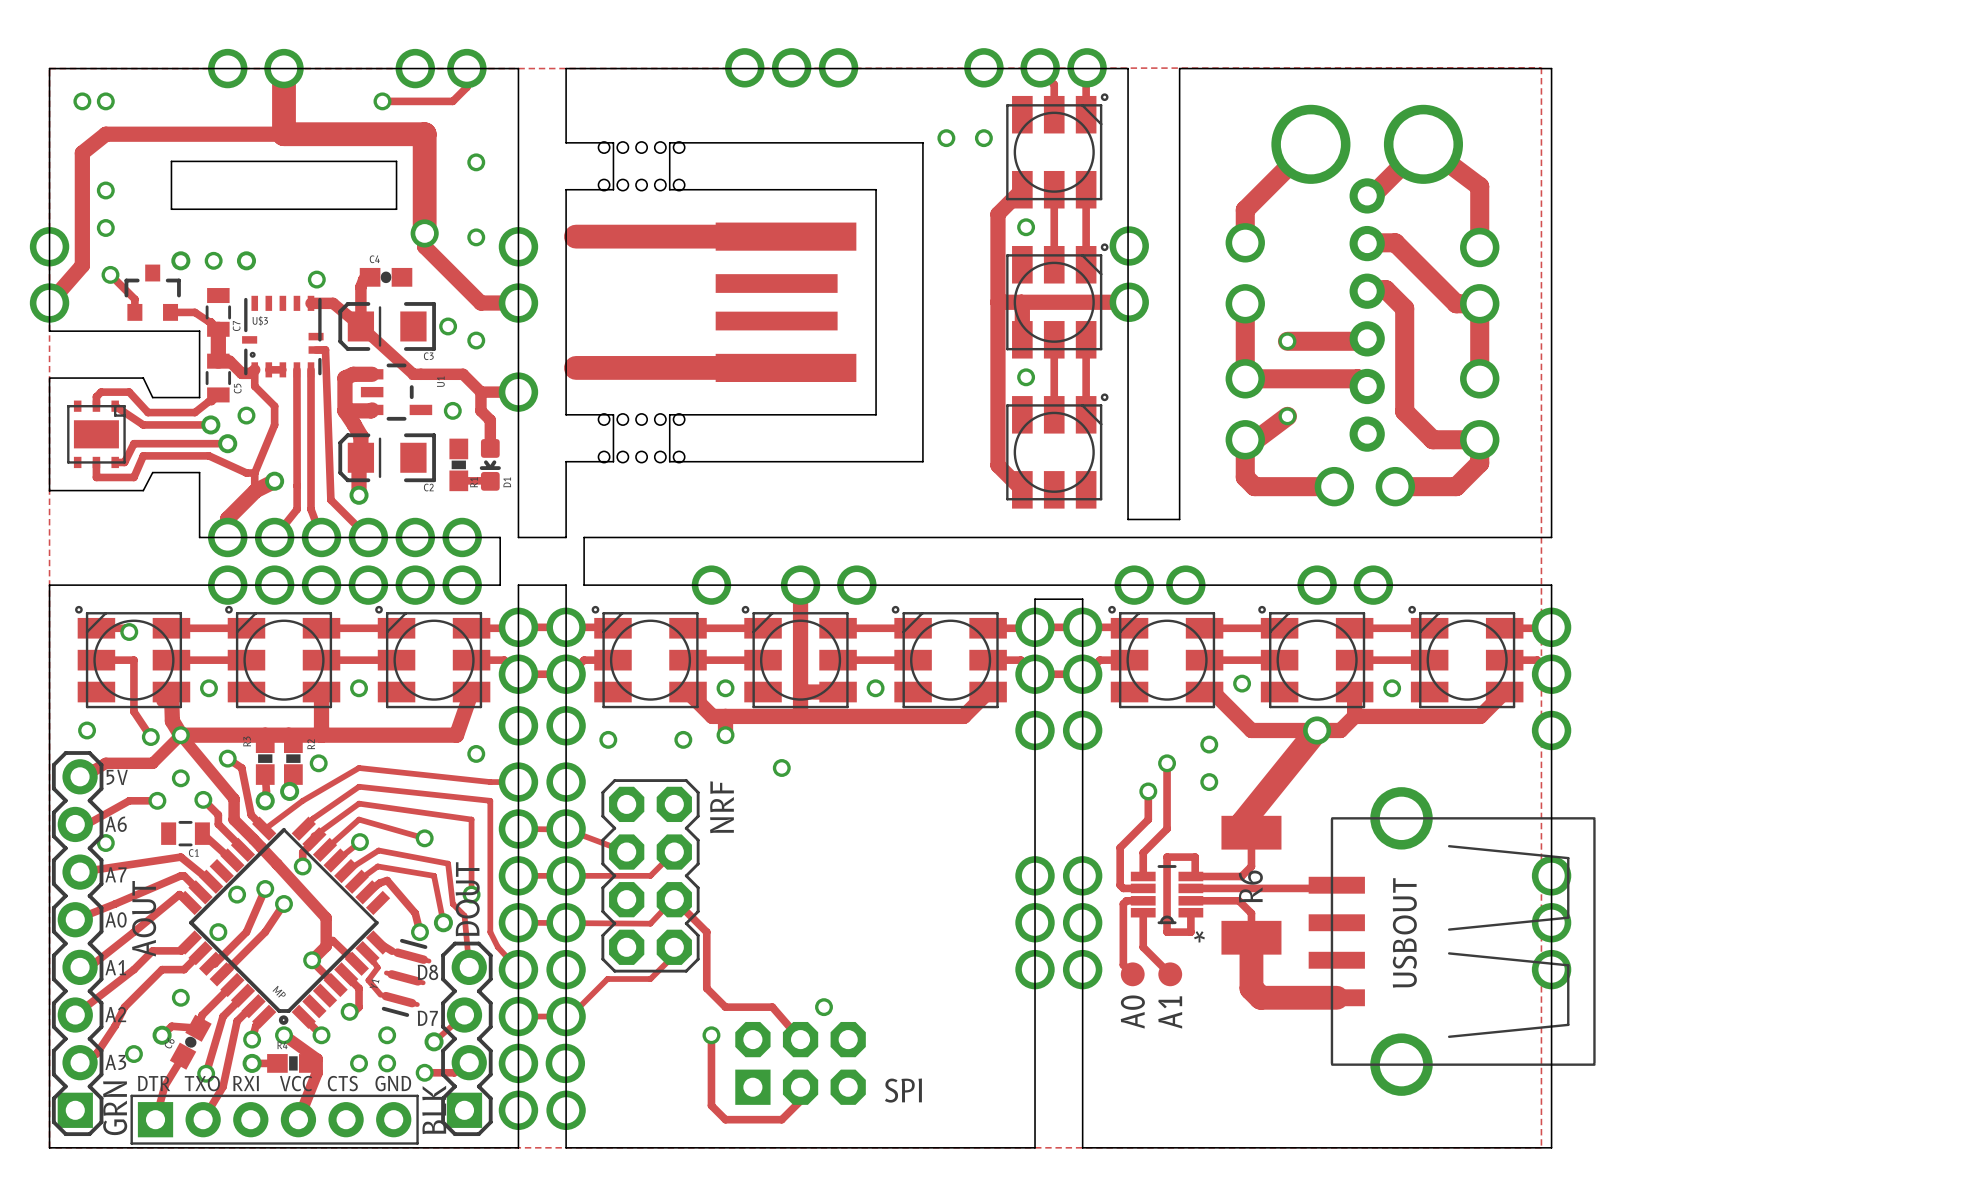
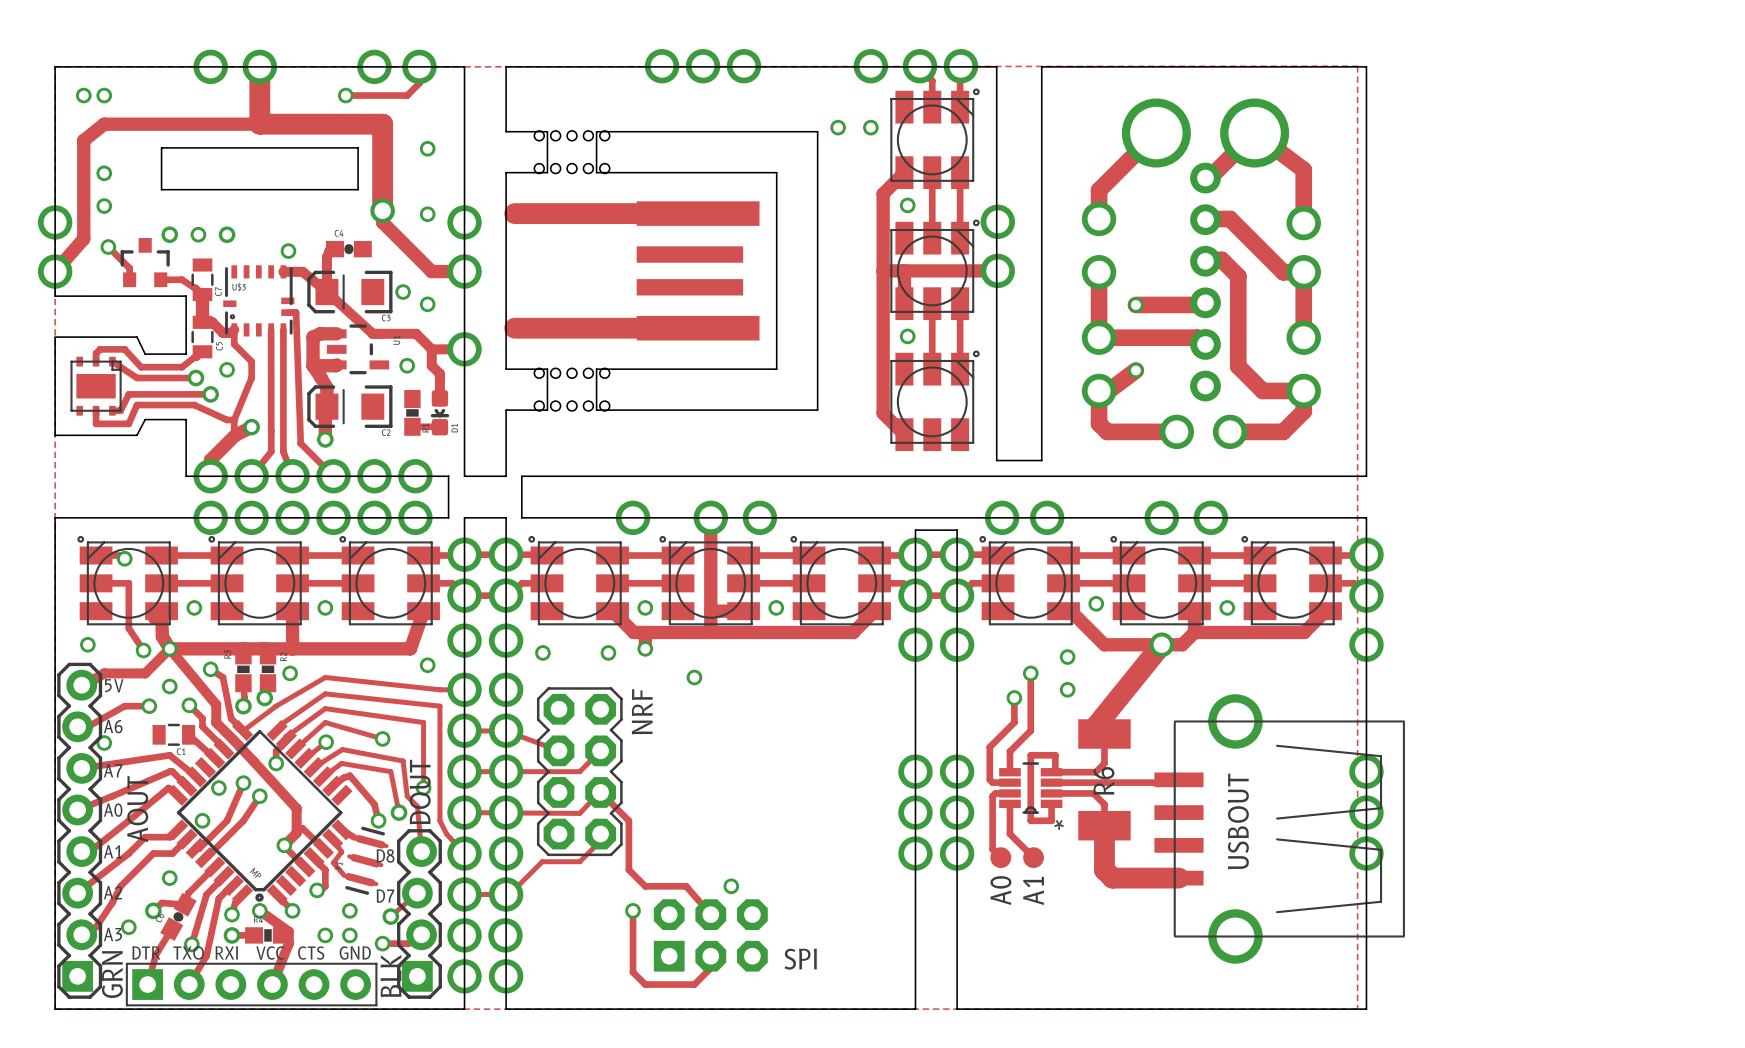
track: (268, 369) (282, 369) -> none

